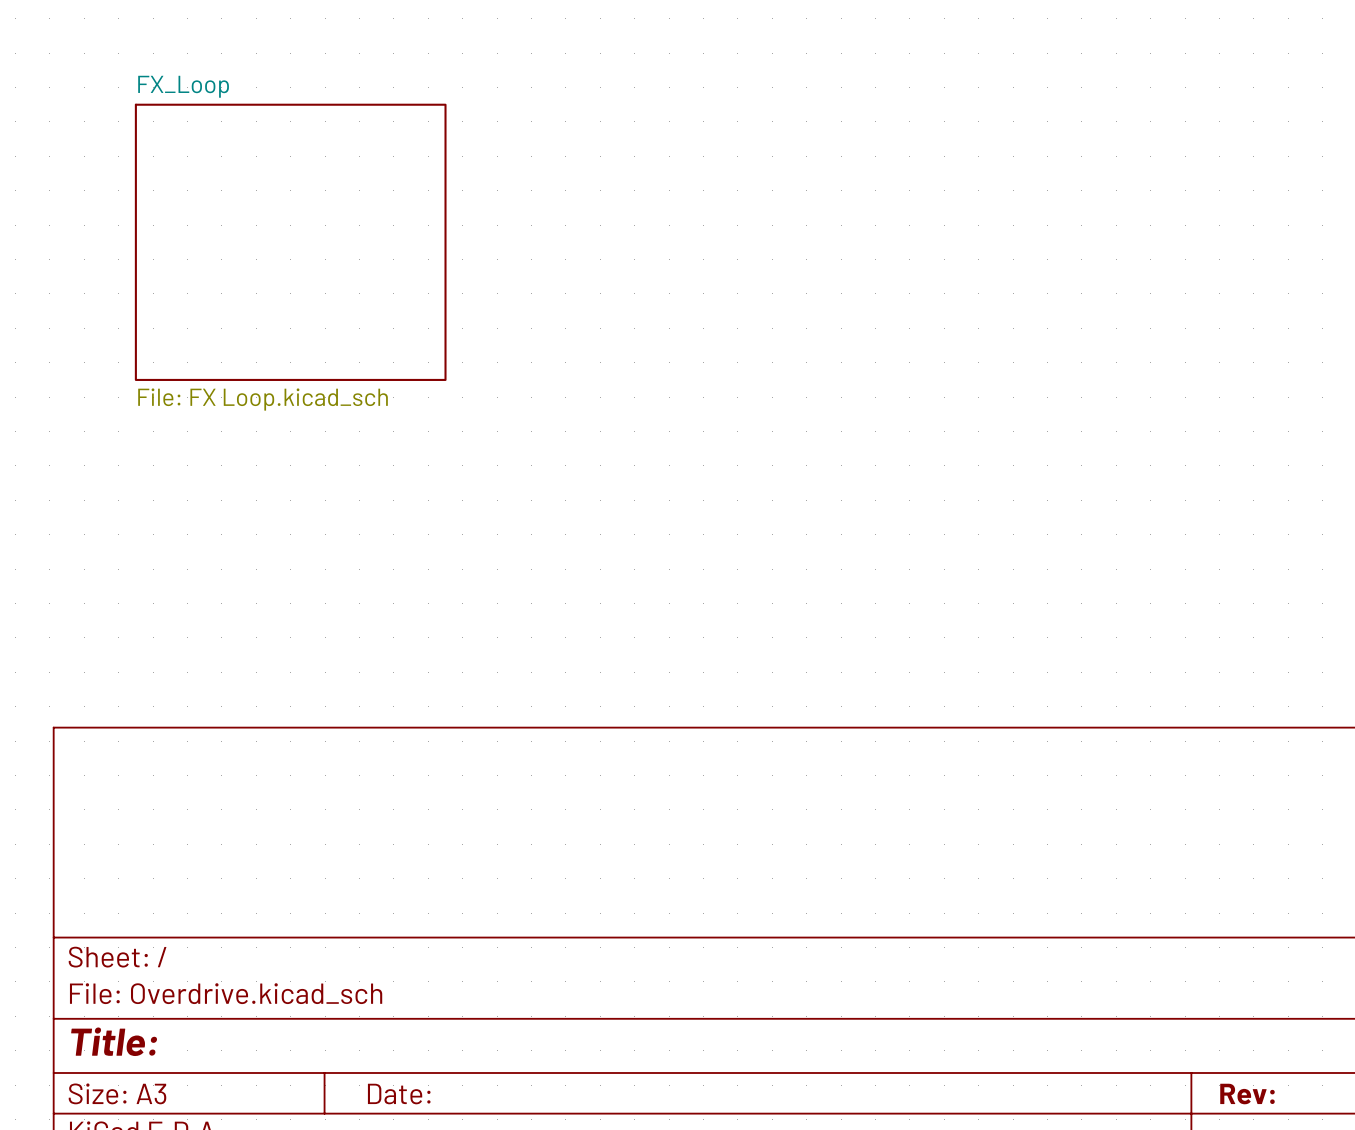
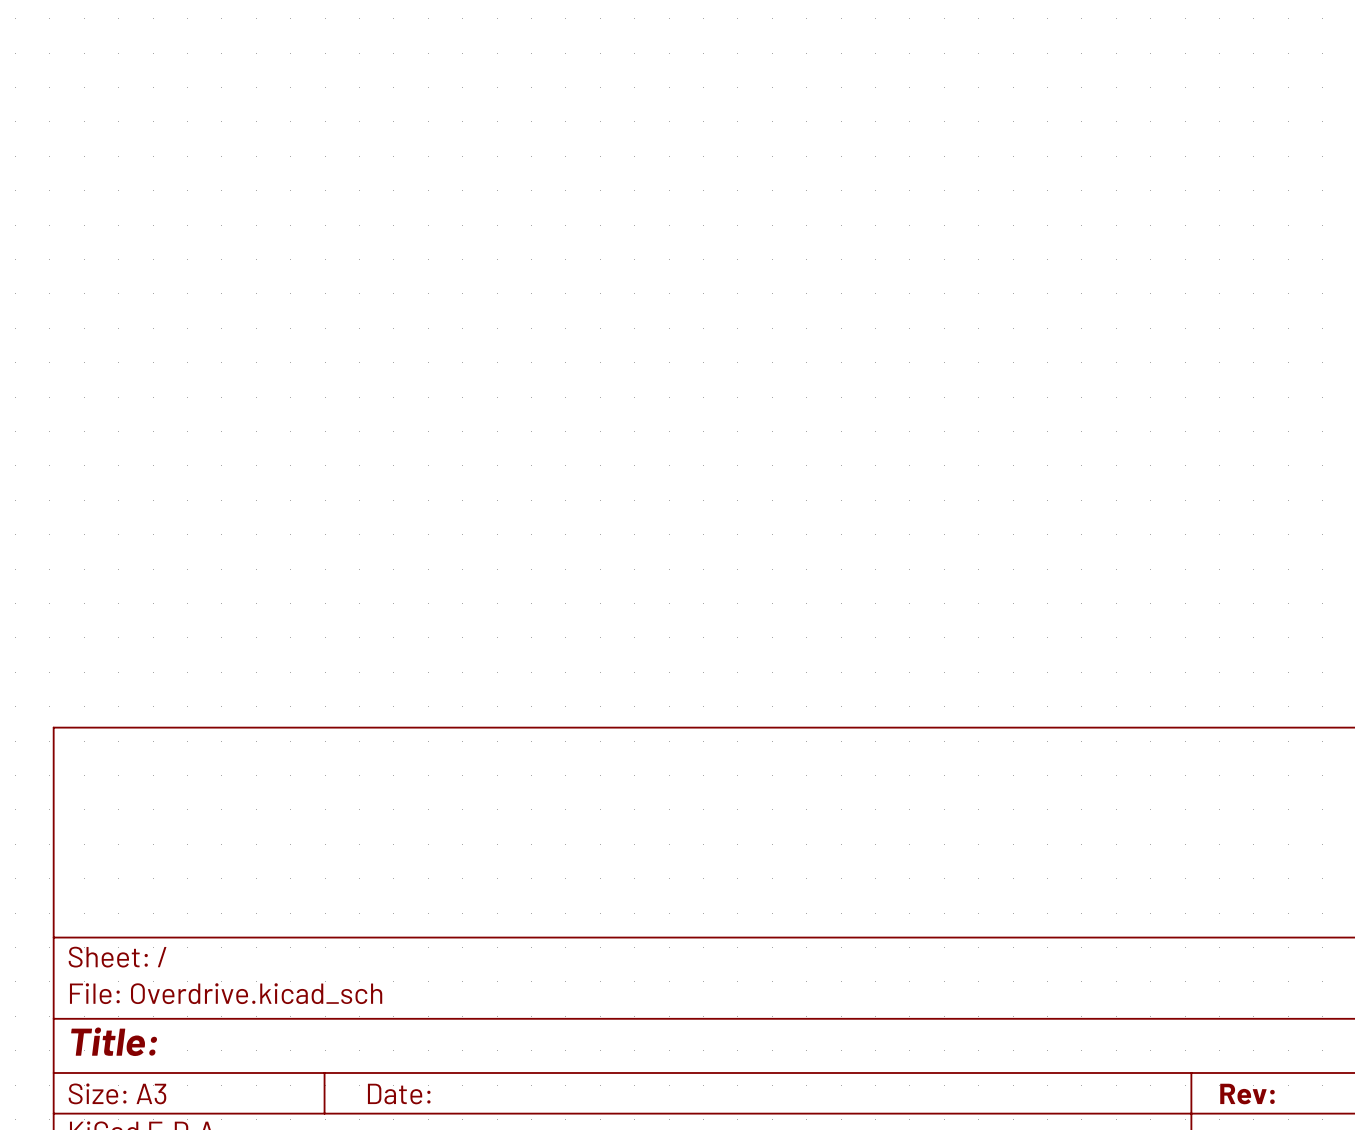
sheet FX_Loop: File: FX Loop.kicad_sch (290, 242) -> none

